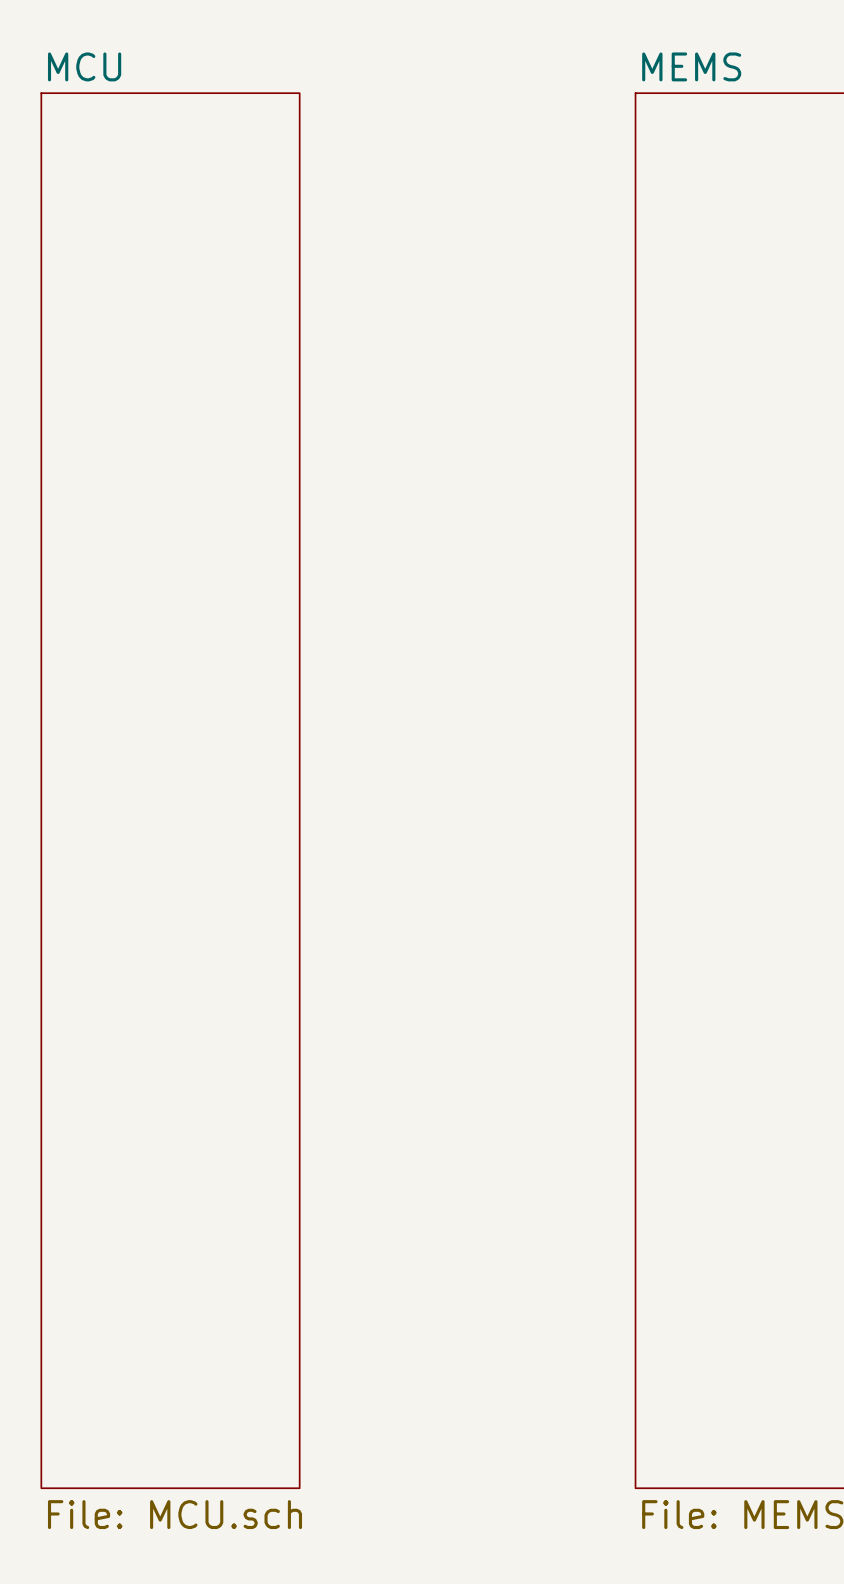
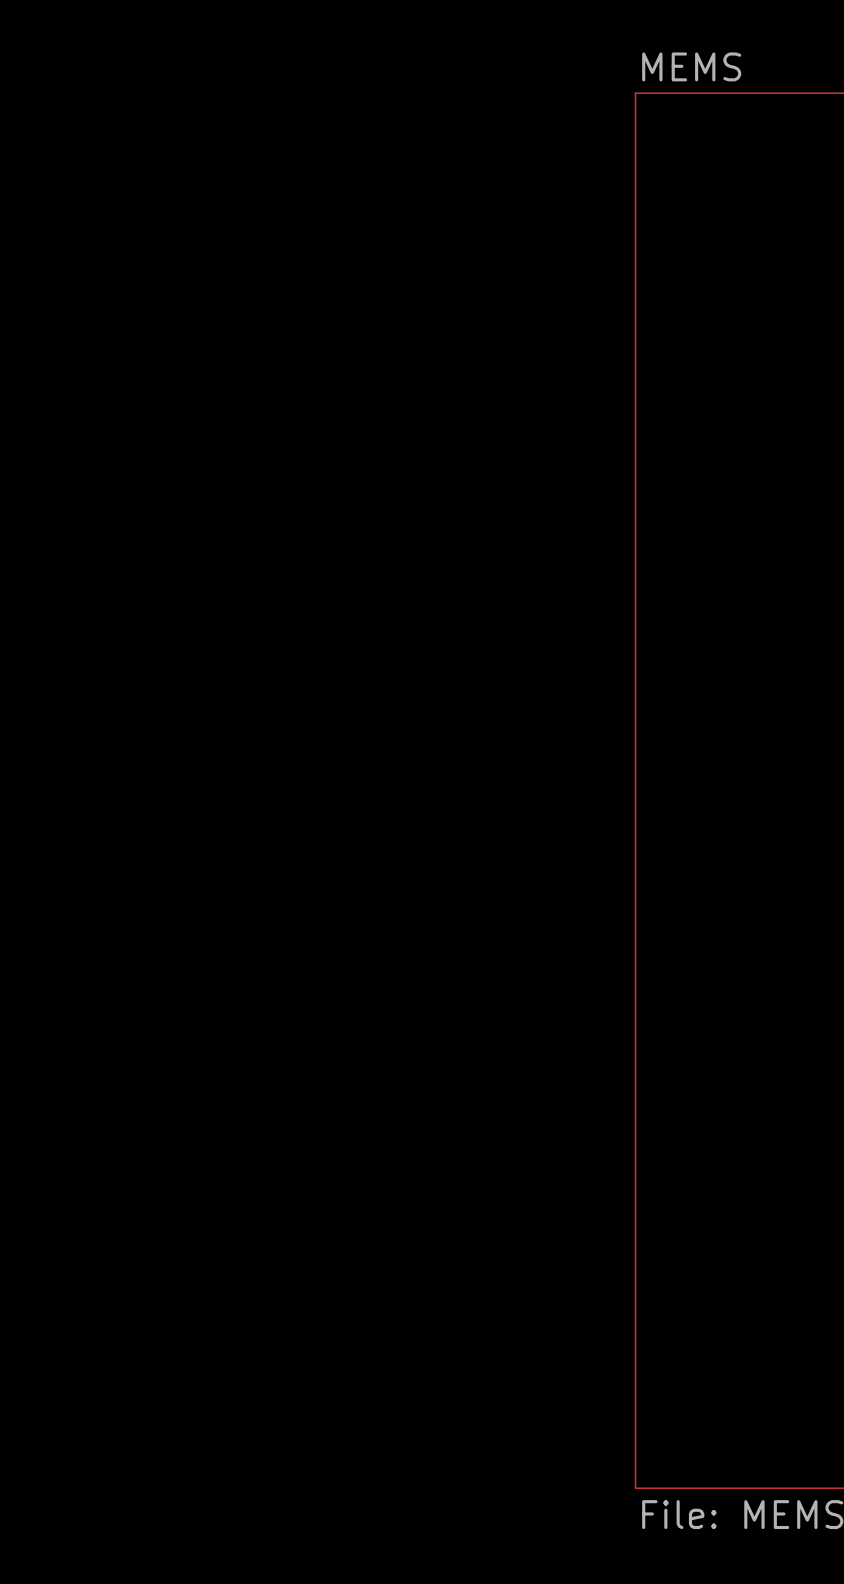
sheet MCU: File: MCU.sch (170, 790) -> none

